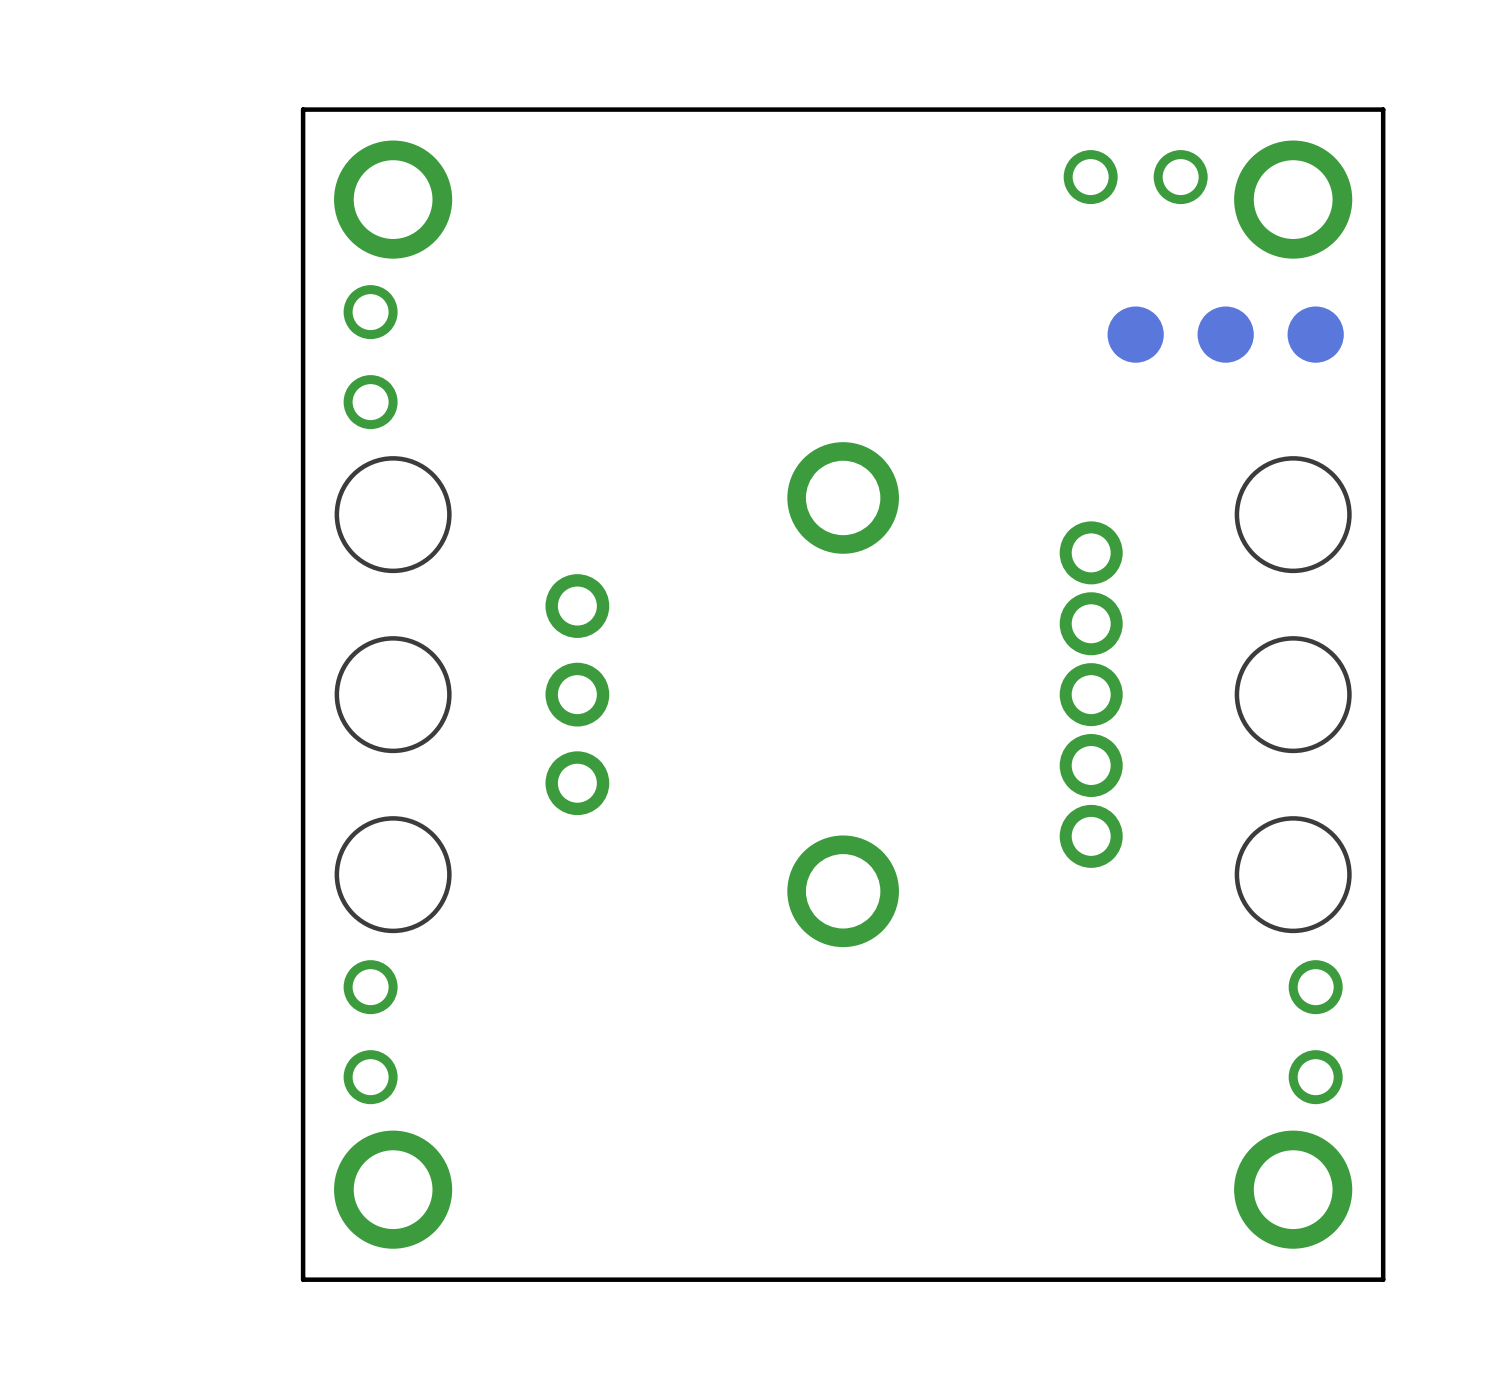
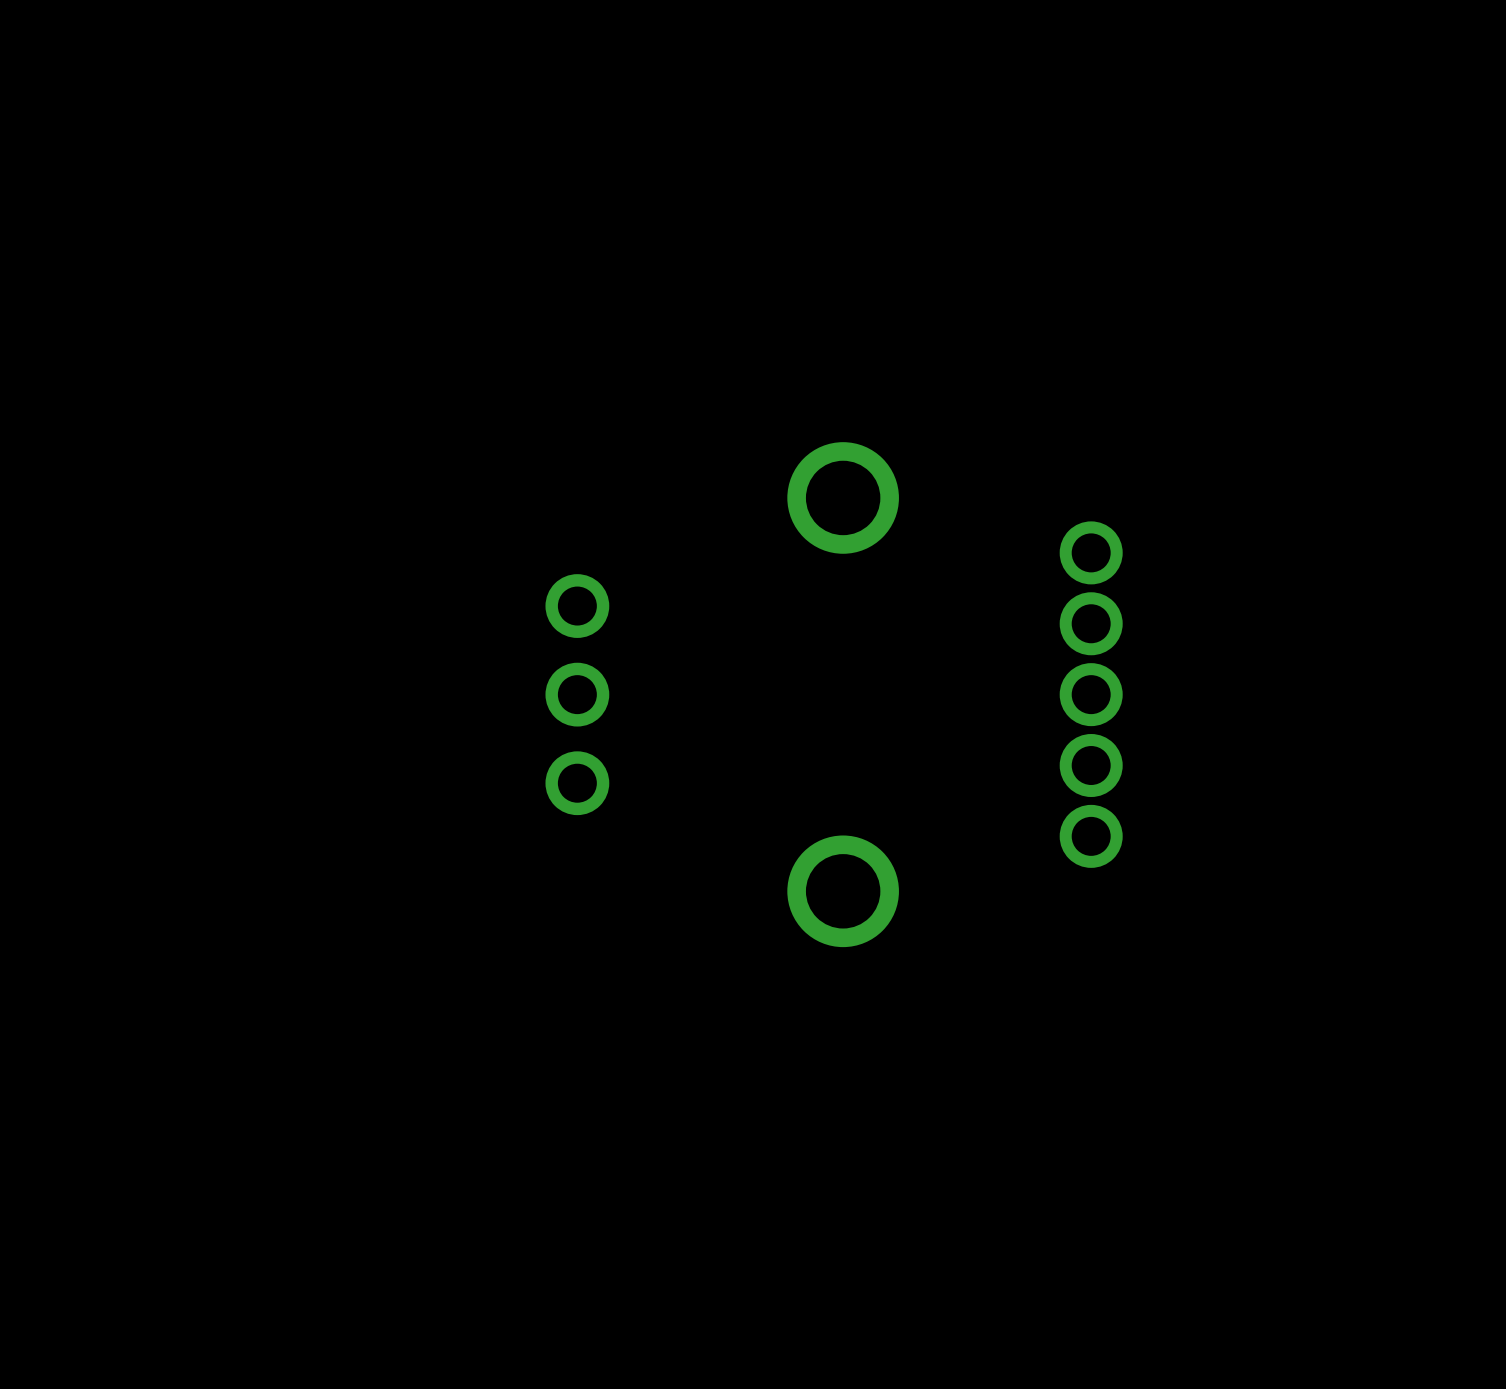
part: (843, 694) -> none

